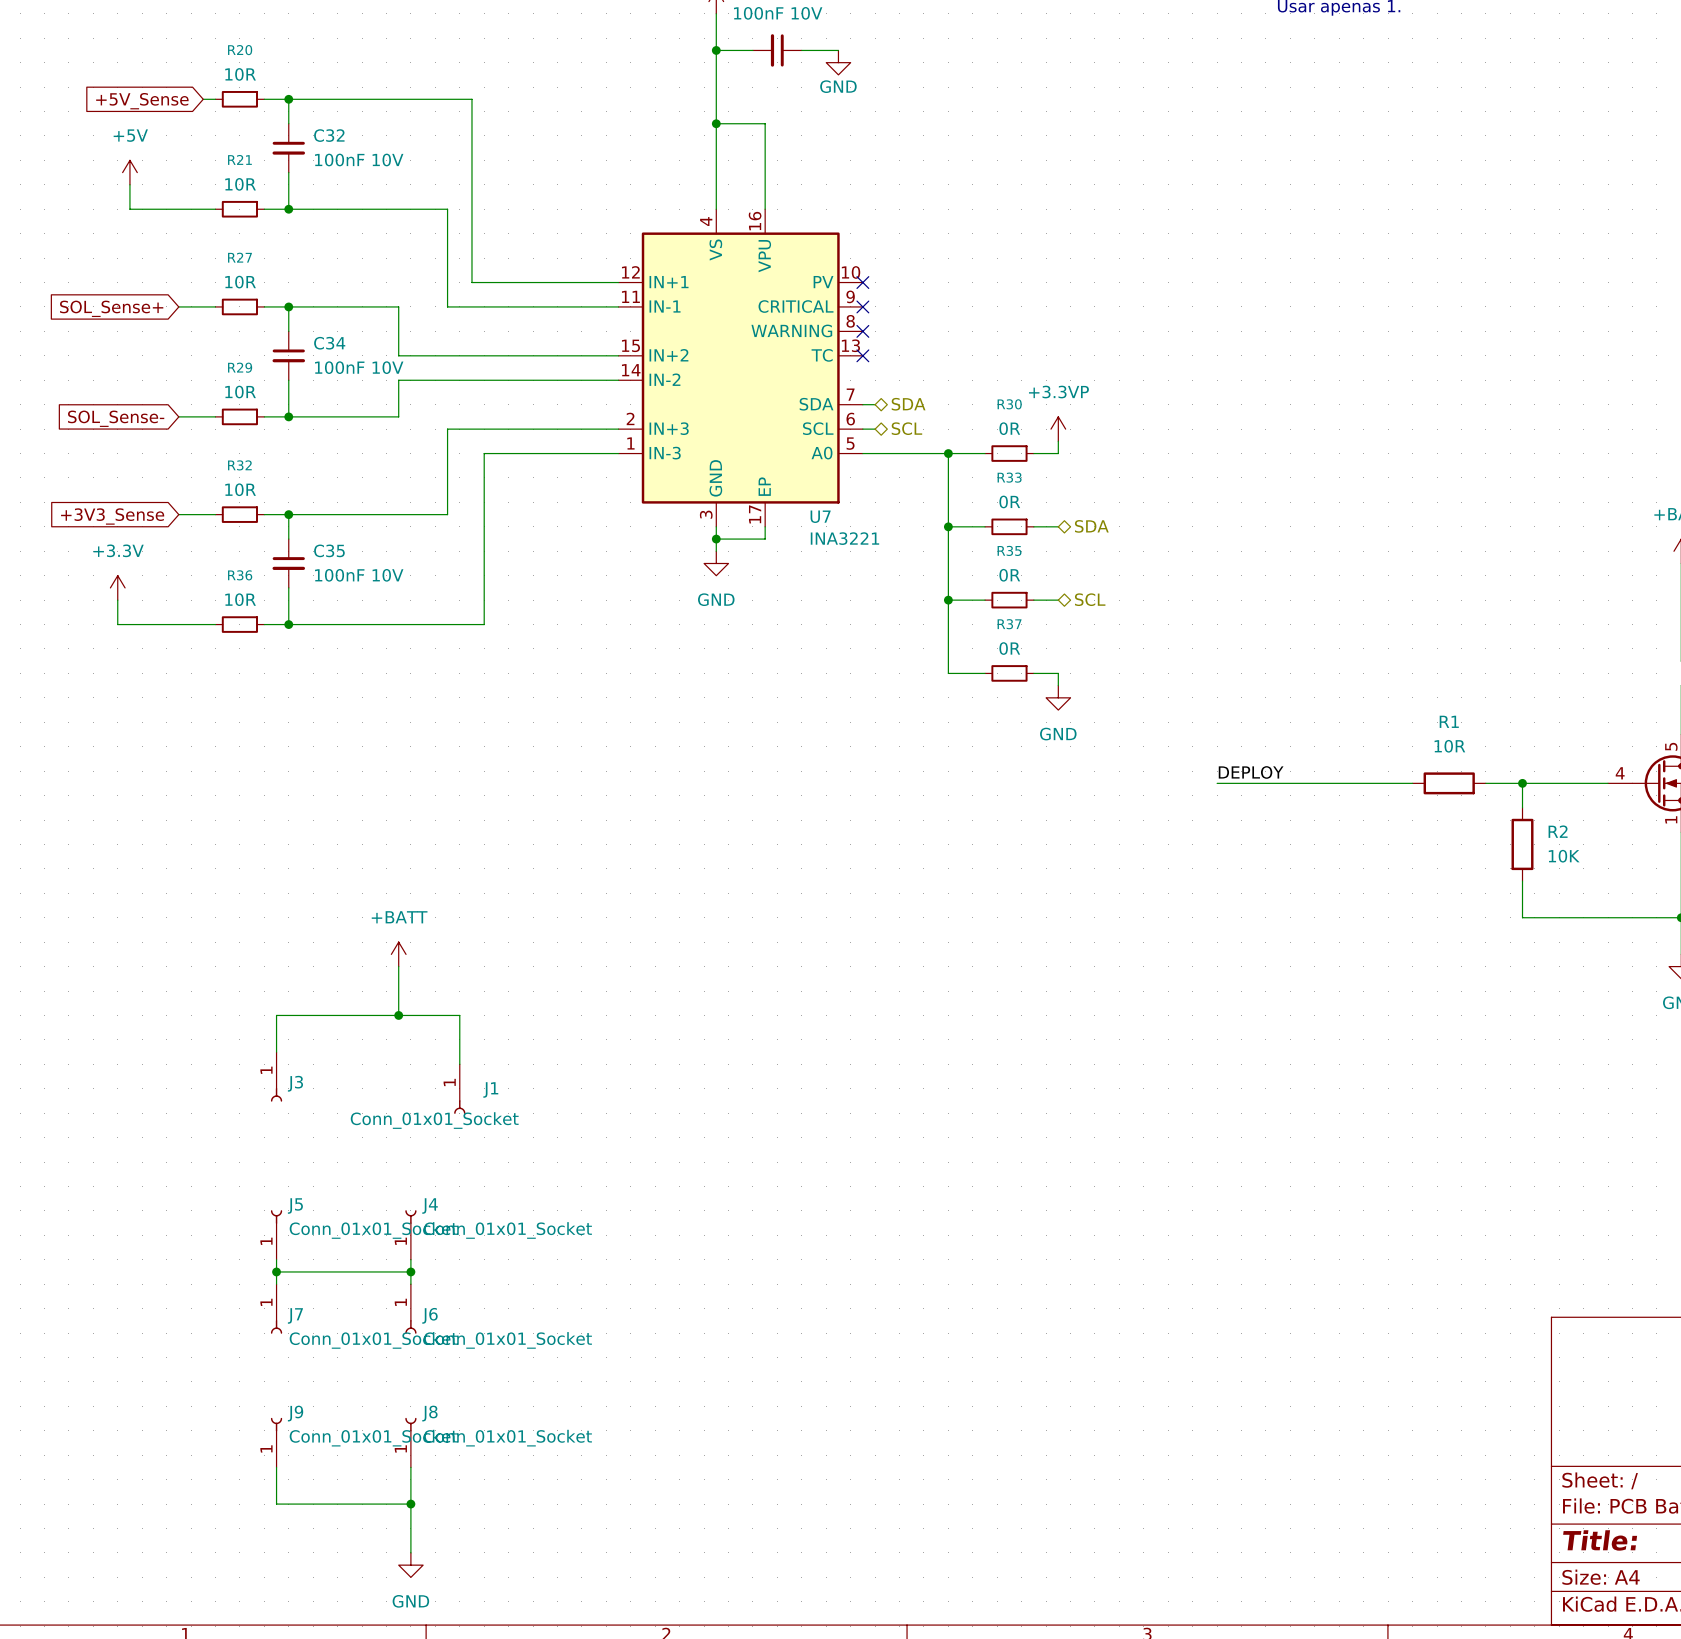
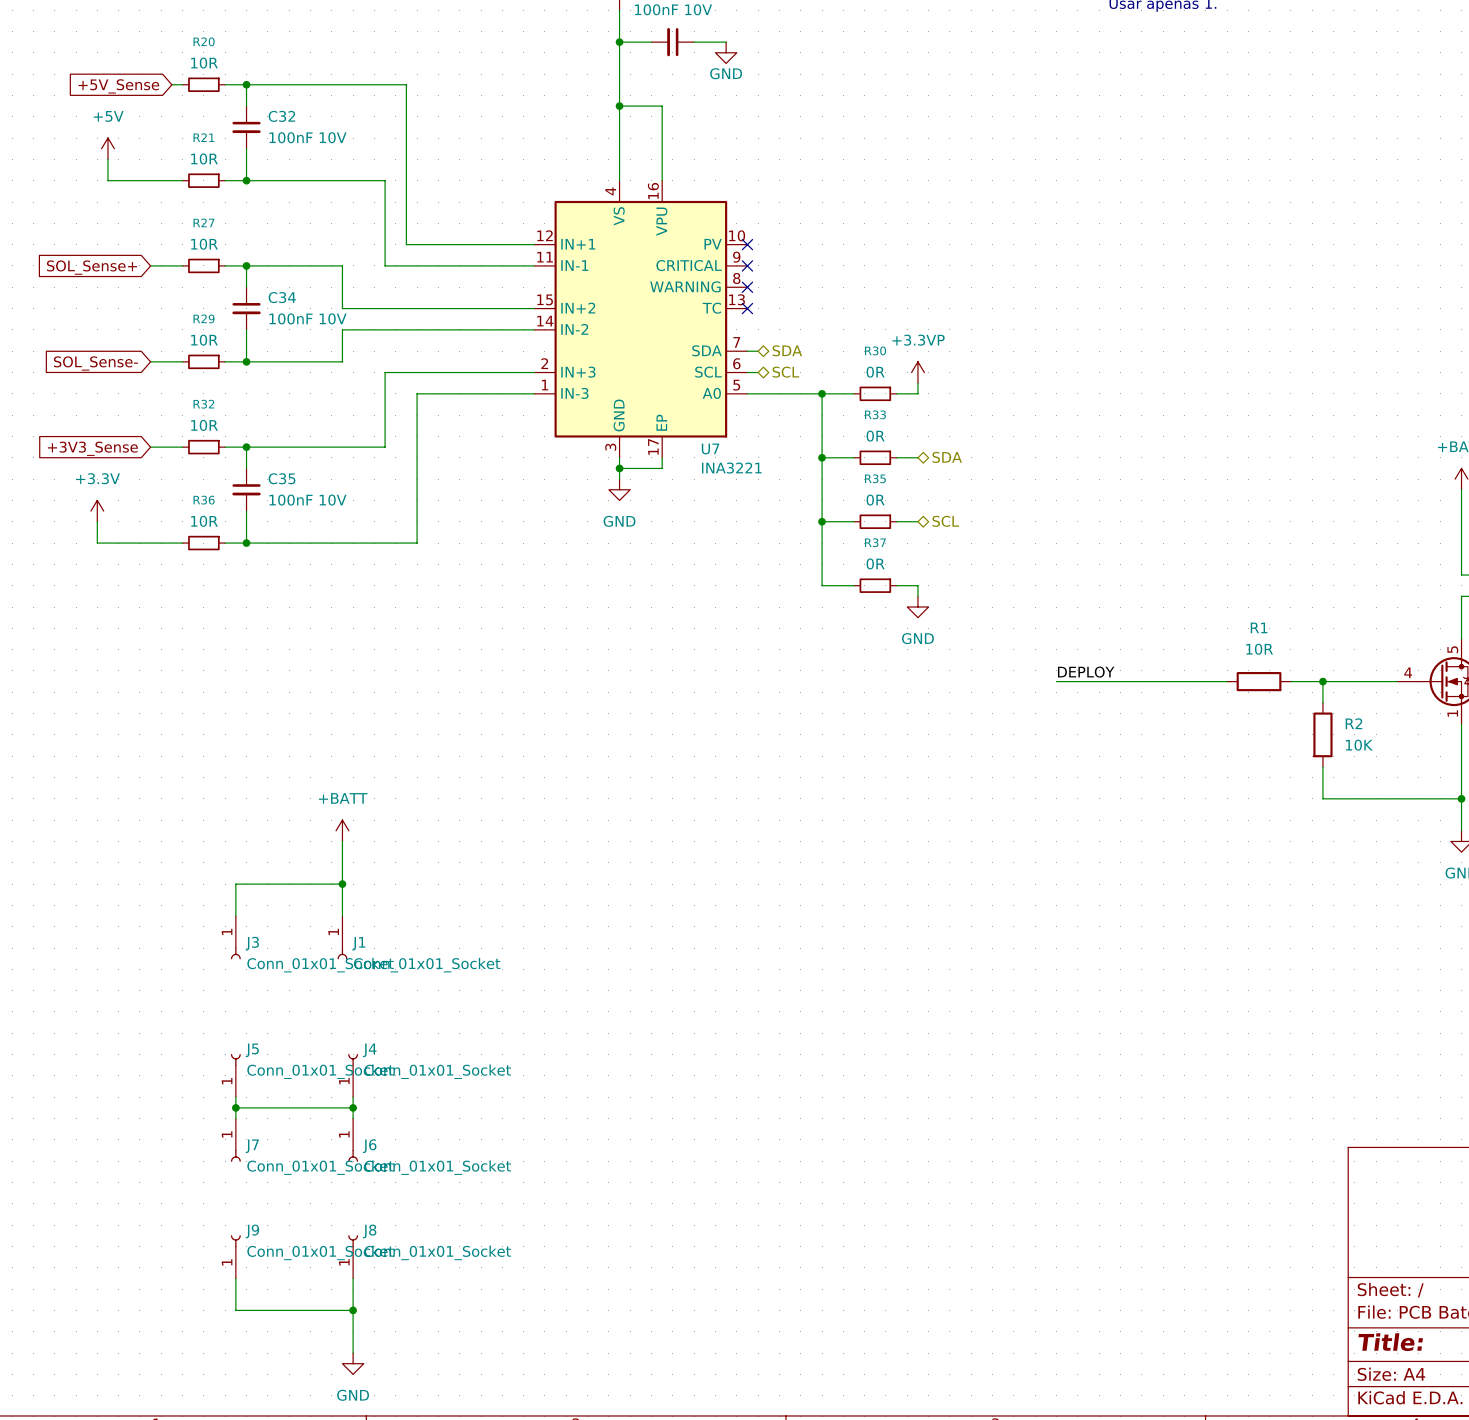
wire: (398, 1015) (459, 1015) (459, 1064) -> (342, 884) (342, 916)
J1 position: (459, 1089) -> (342, 937)
J1 name position: J1 (490, 1089) -> J1 (358, 943)
J1 value: none -> Conn_01x01_Socket (427, 965)
J3 value position: Conn_01x01_Socket (434, 1120) -> Conn_01x01_Socket (320, 965)

